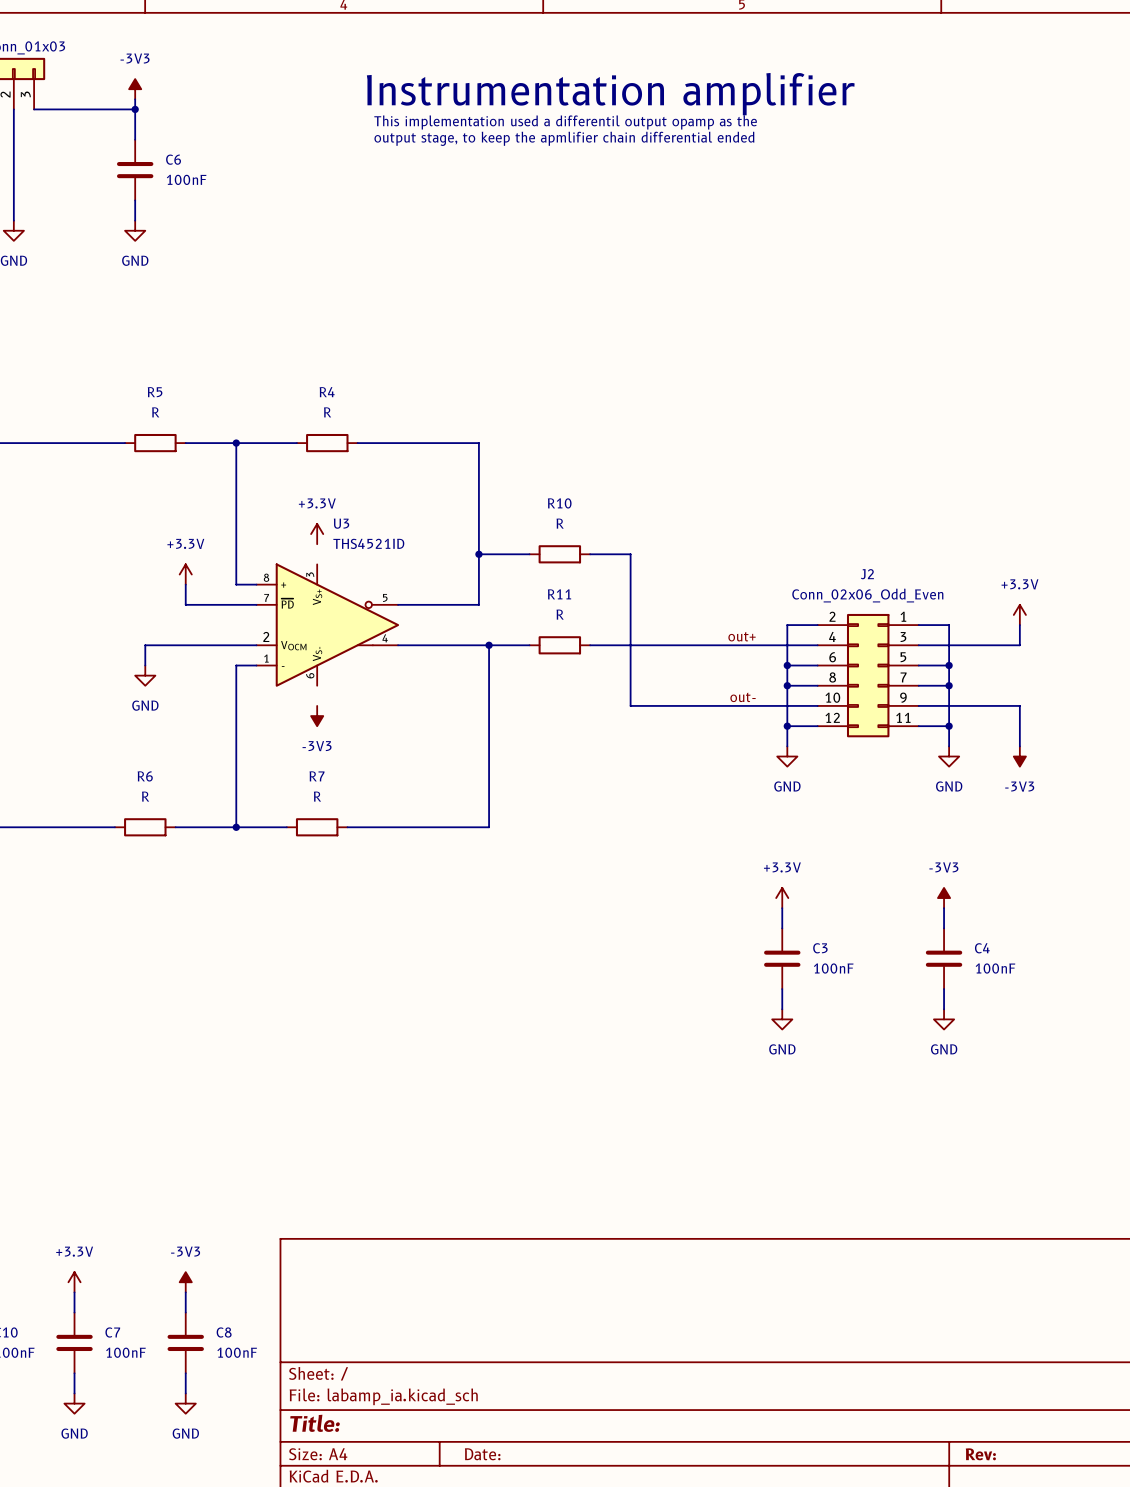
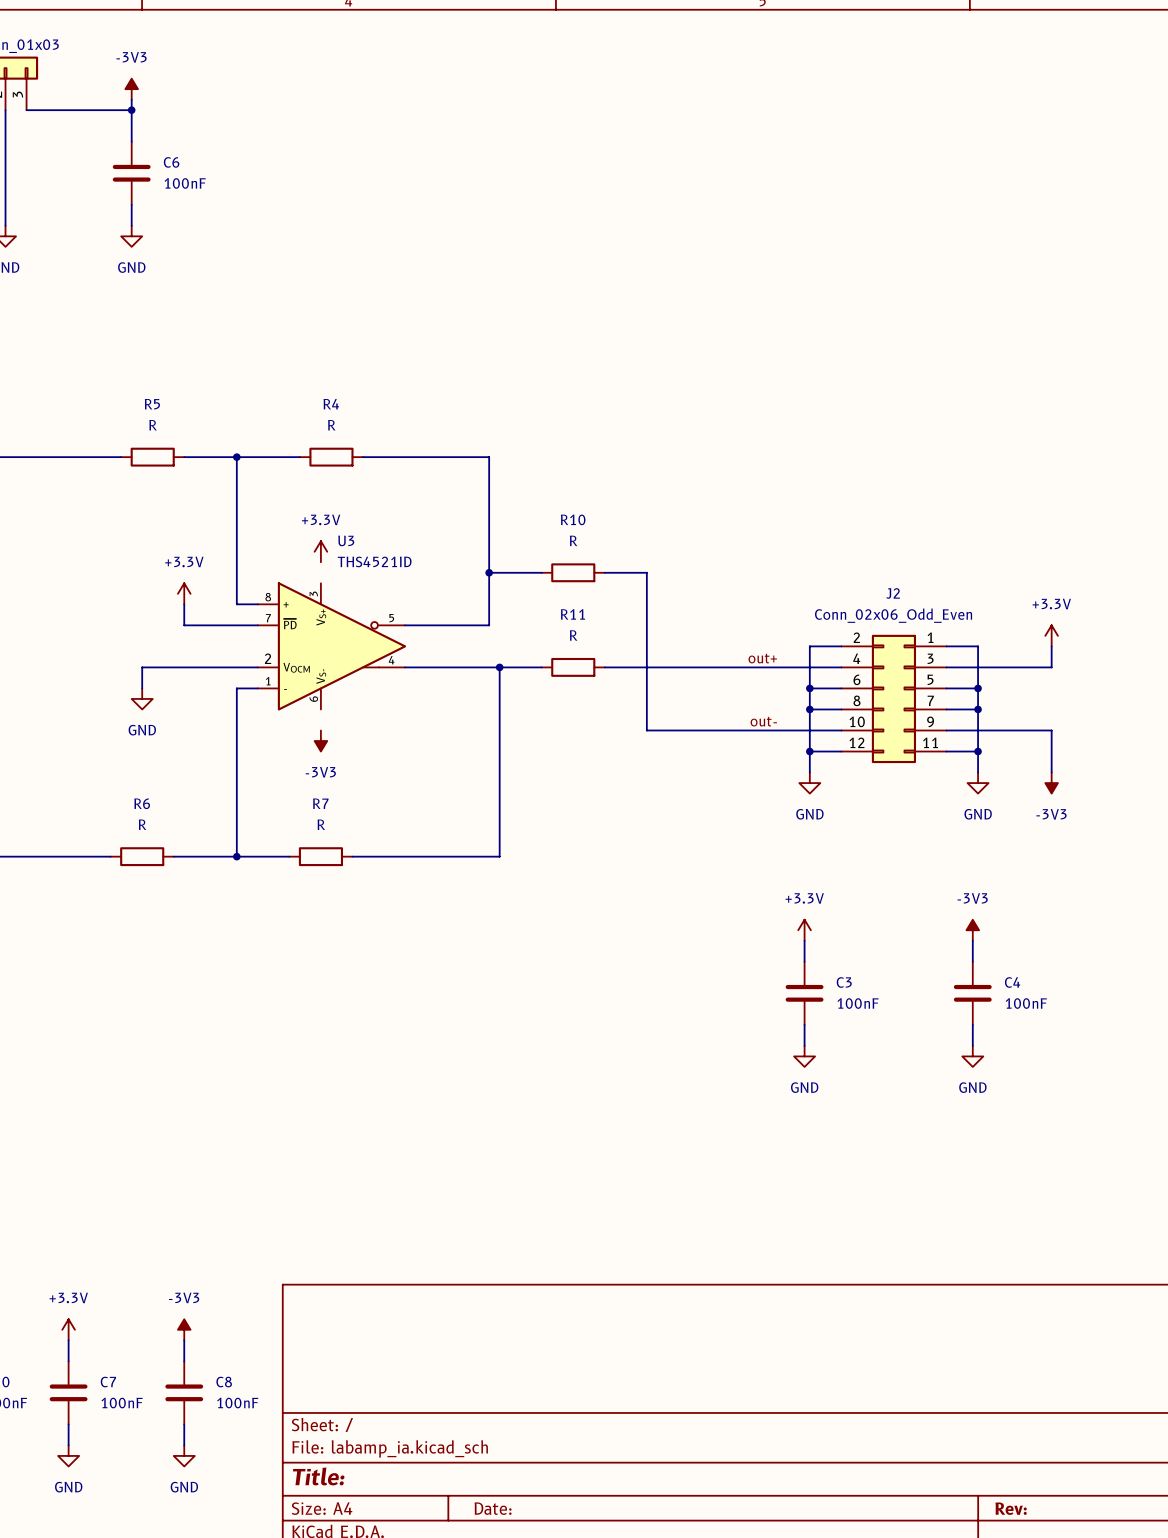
text: Instrumentation amplifier (610, 94) -> none
text: This implementation used a differentil output opamp as the (565, 122) -> none
text: output stage, to keep the apmlifier chain differential ended (564, 138) -> none

